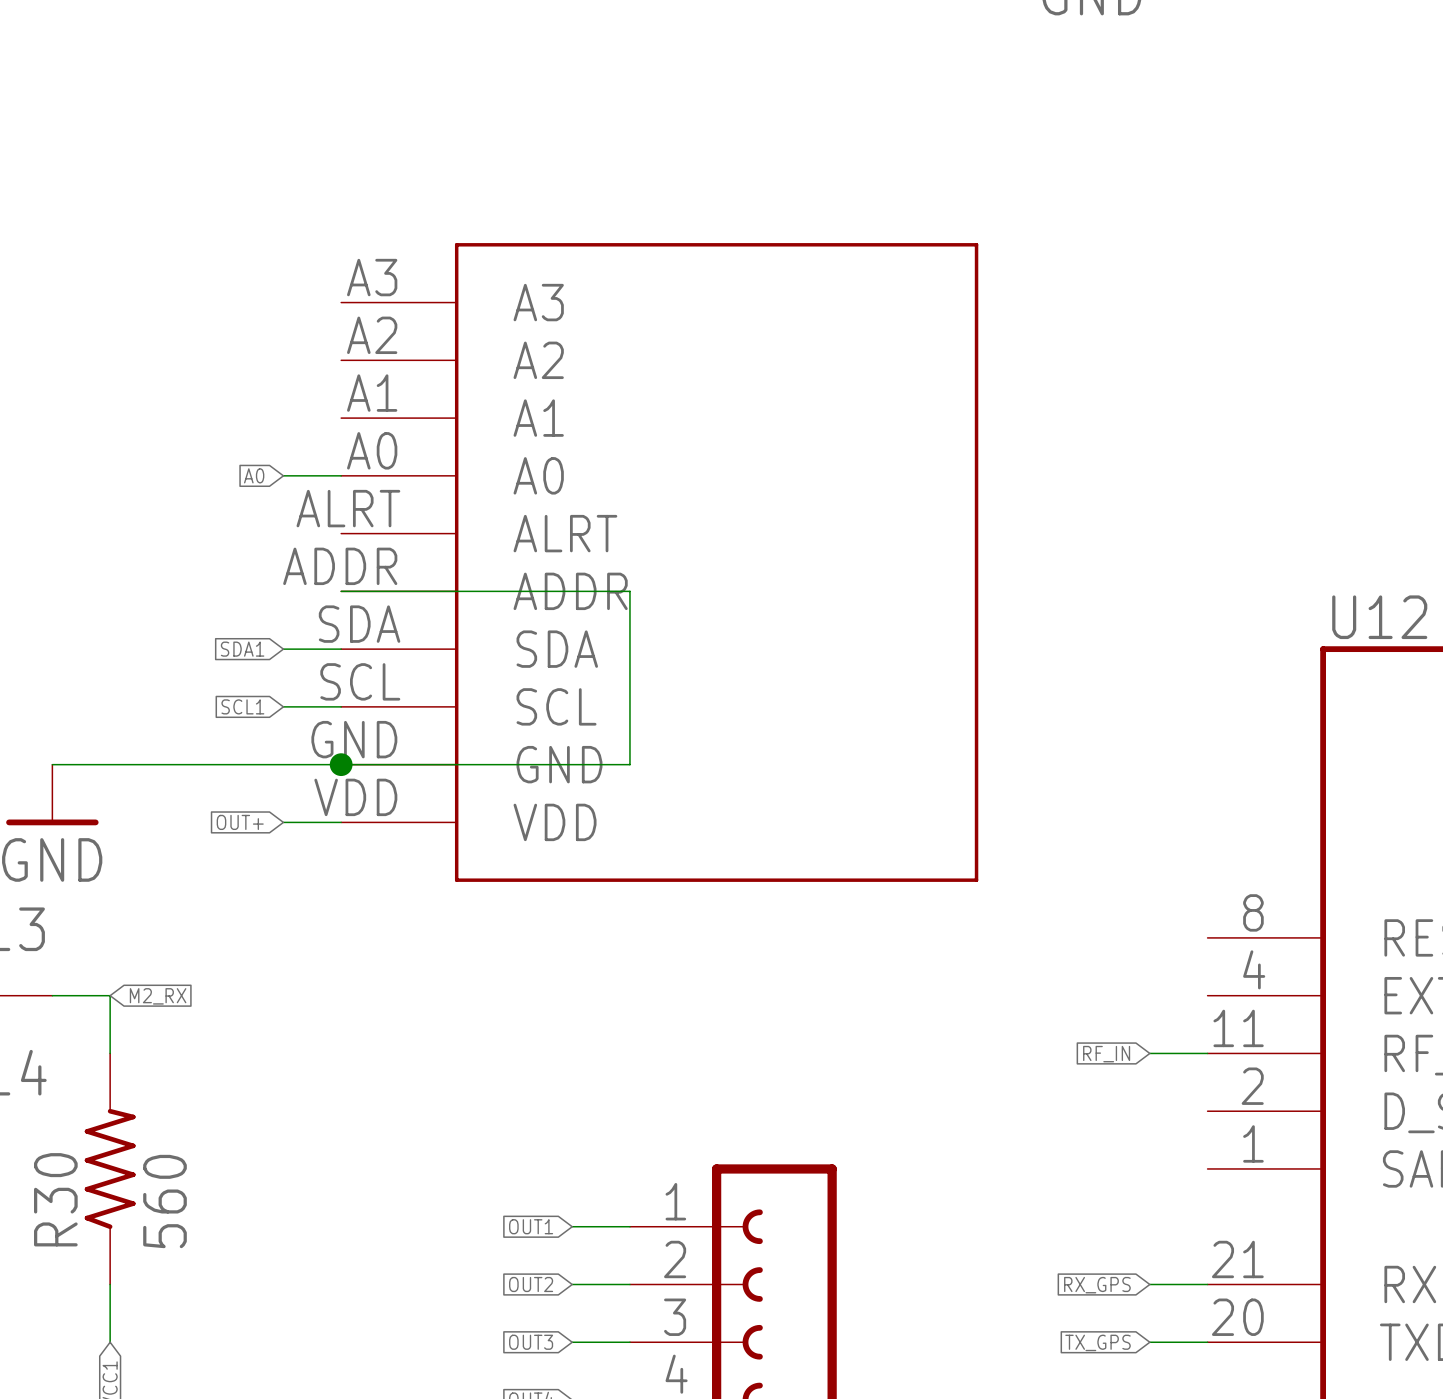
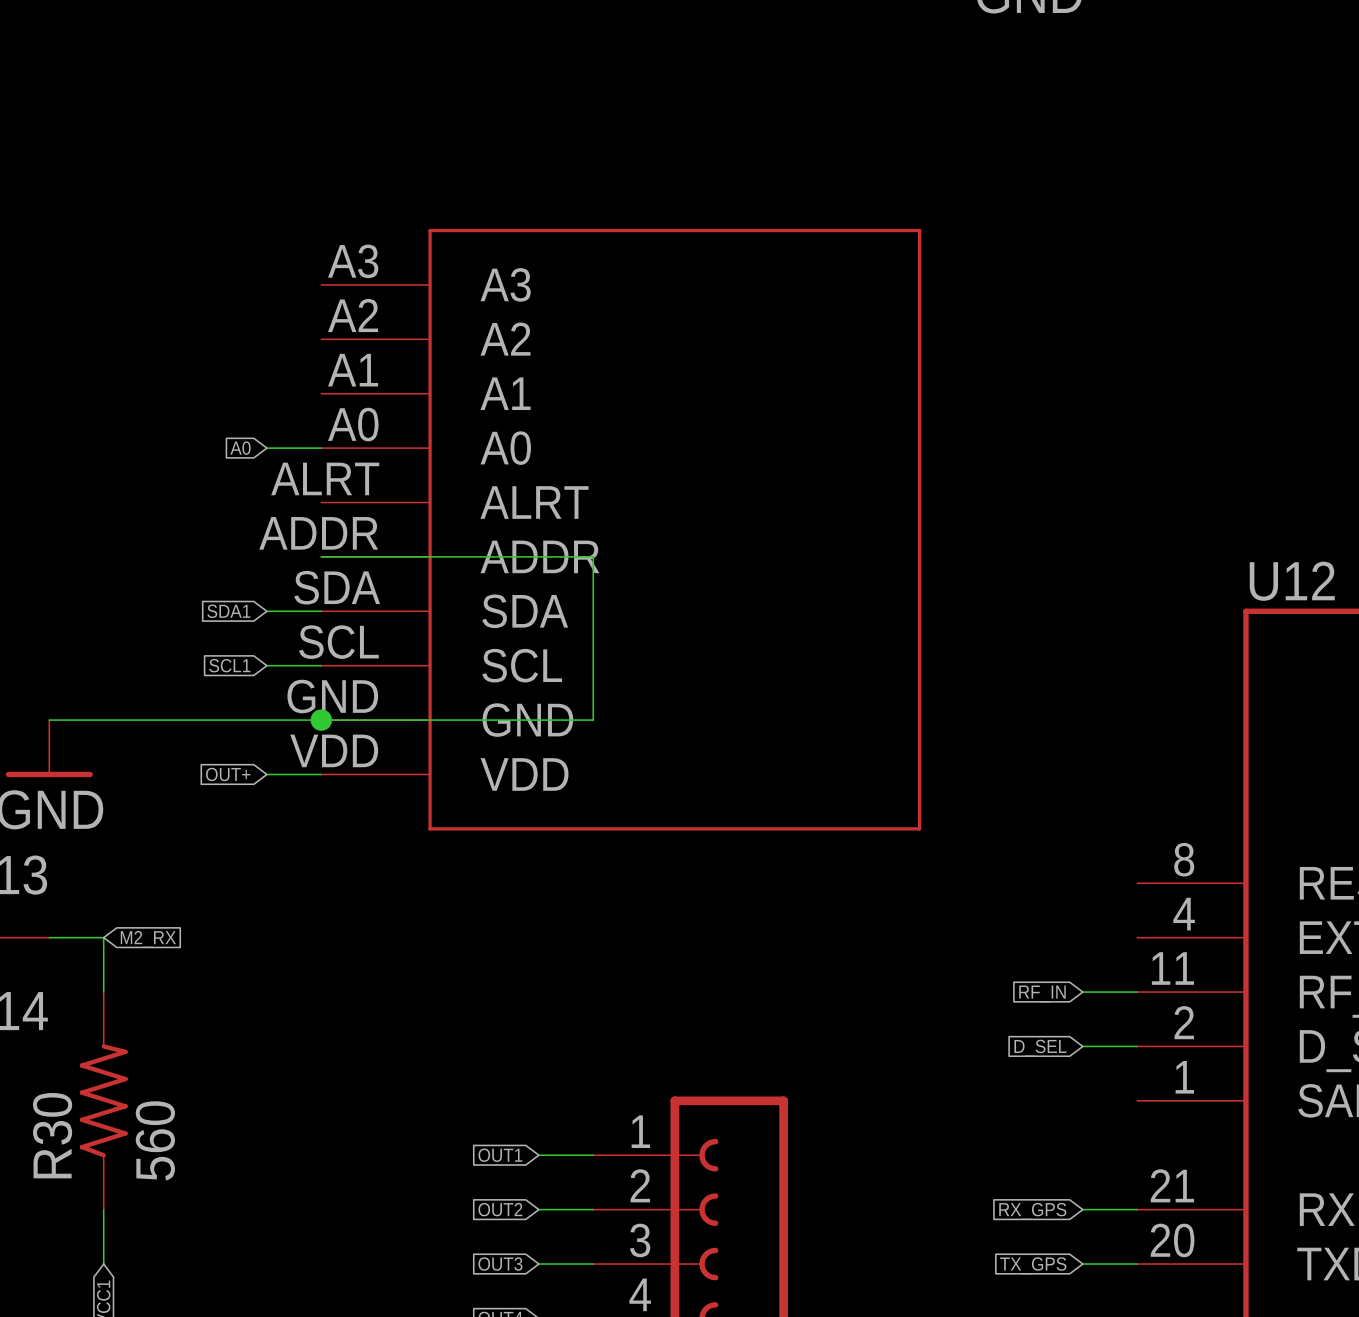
global label: none -> D_SEL (1040, 1048)
wire: none -> (1082, 1046) (1137, 1046)

